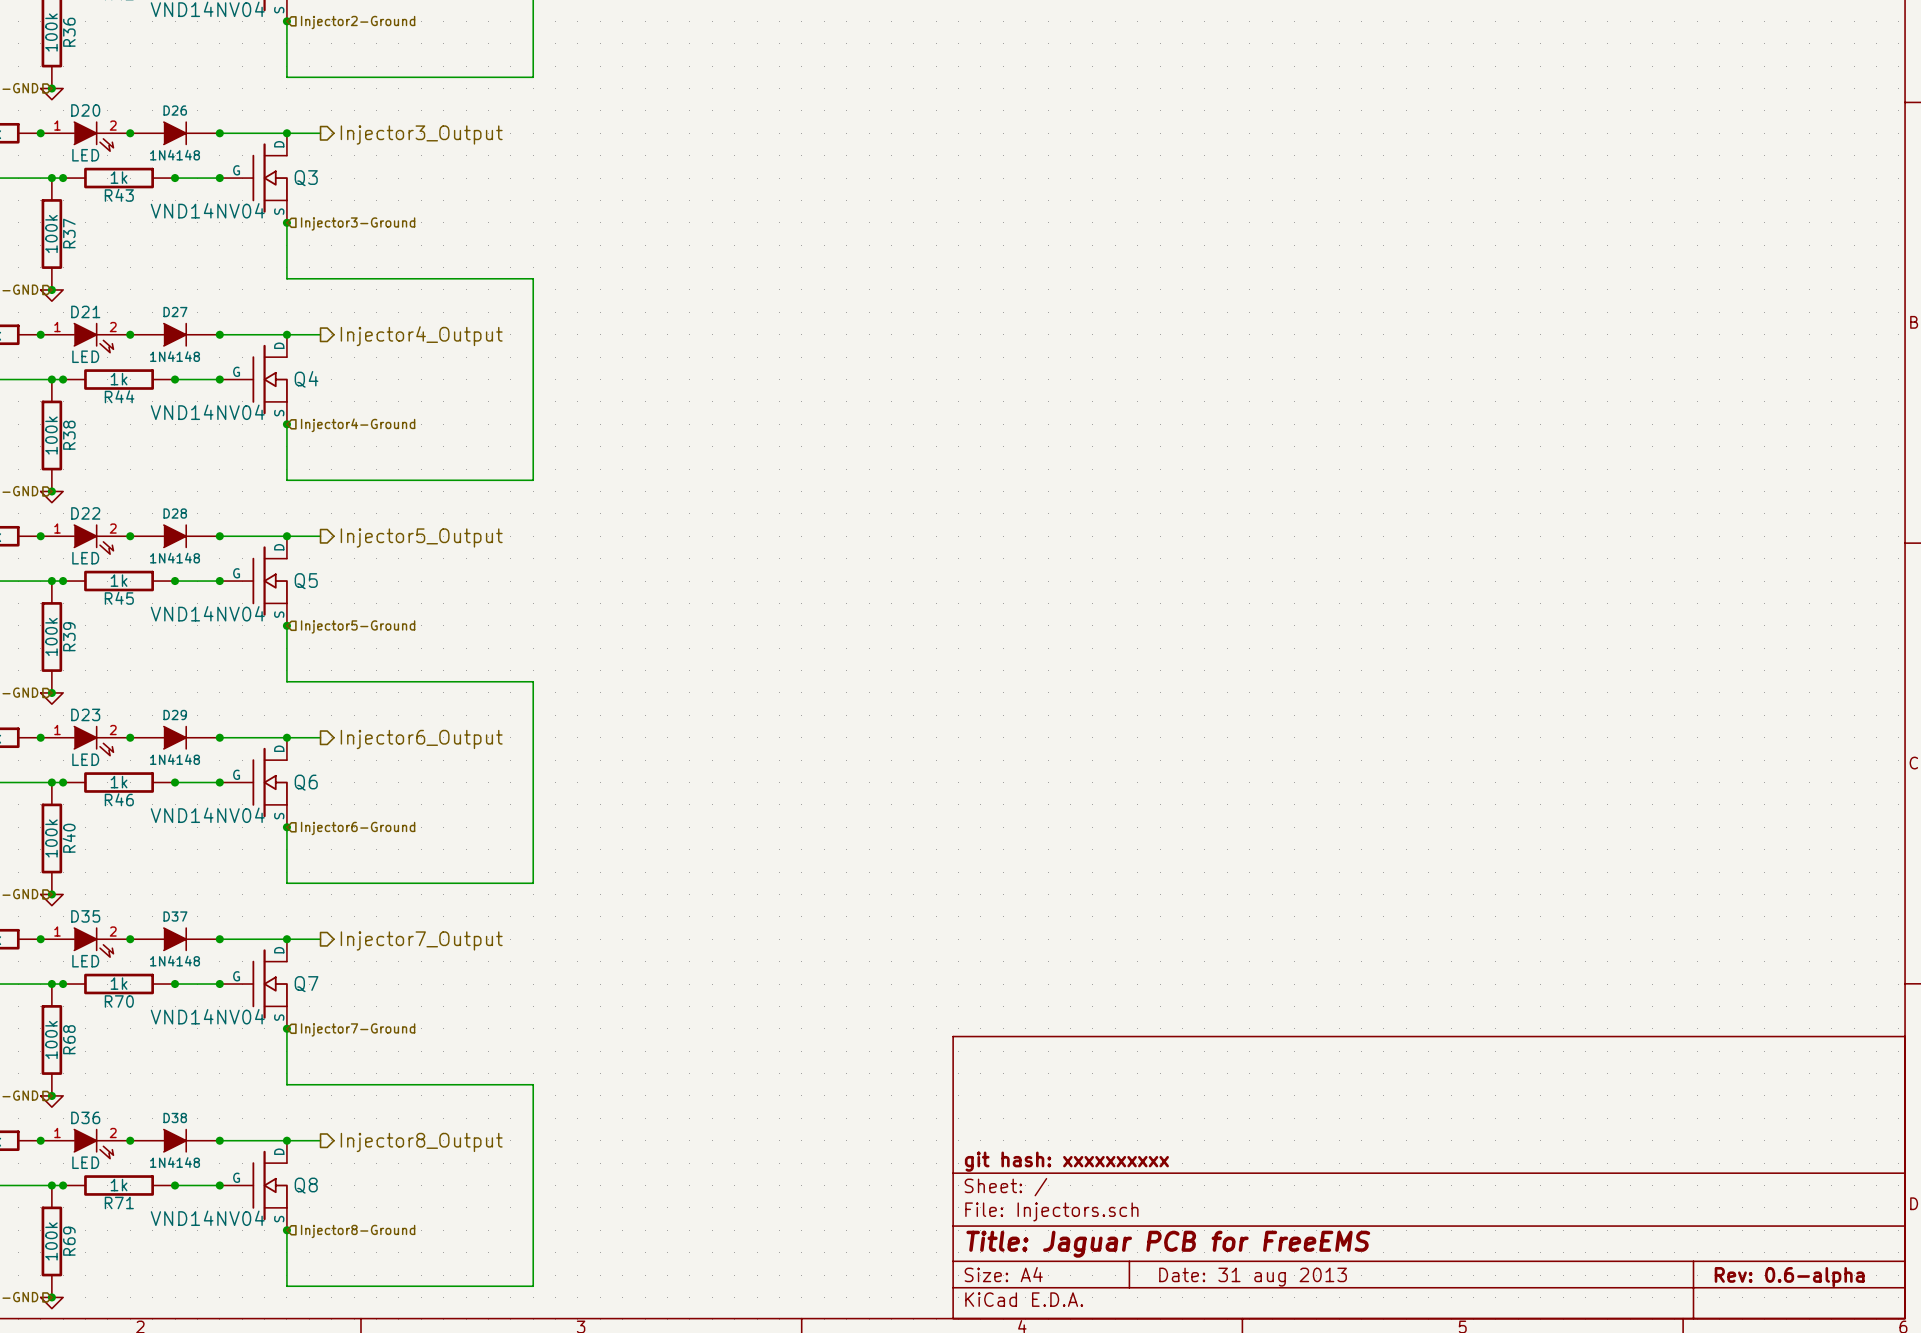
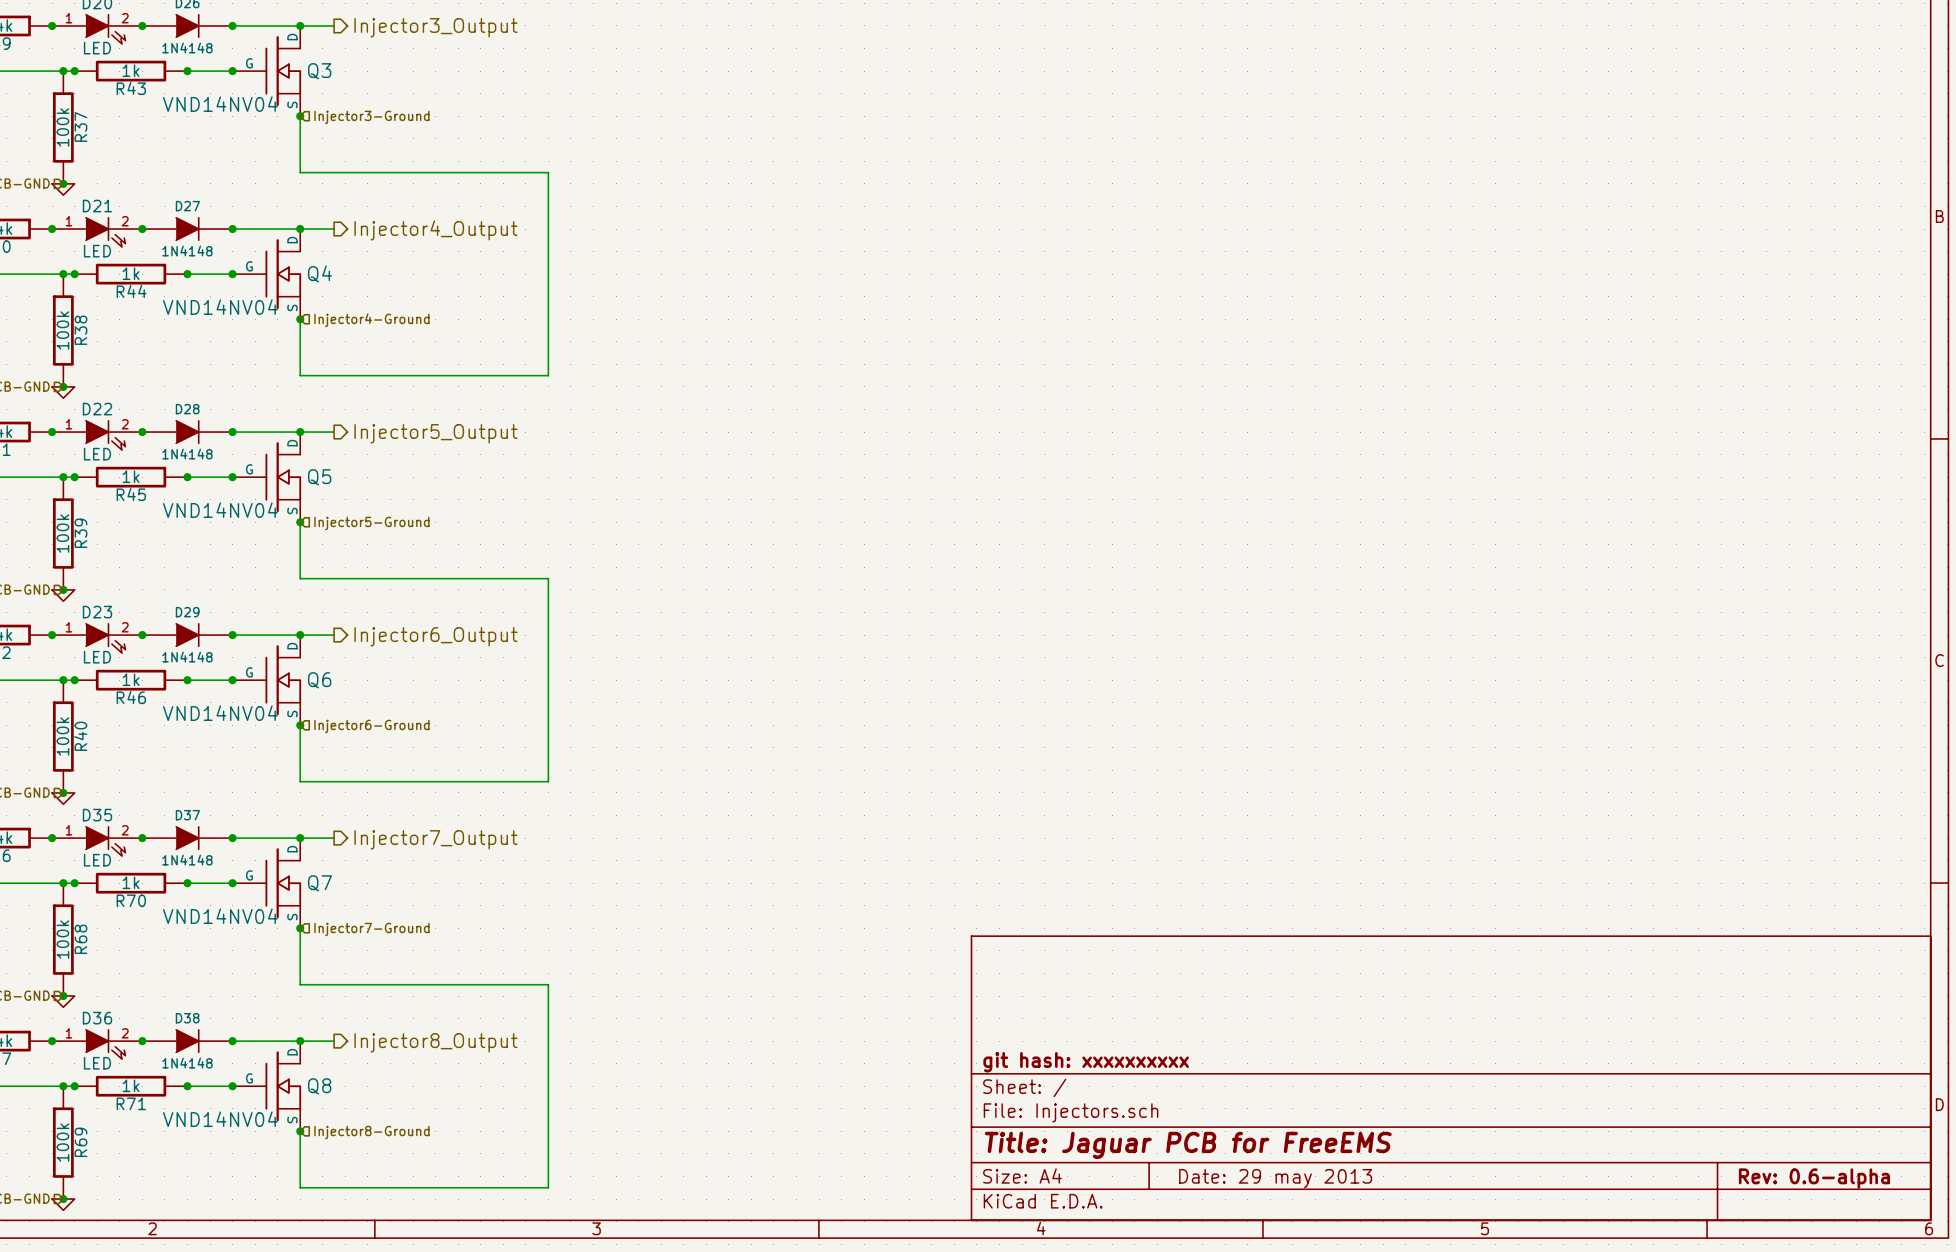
title block: Date: 31 aug 2013 (1253, 1277) -> Date: 29 may 2013 (1275, 1178)

